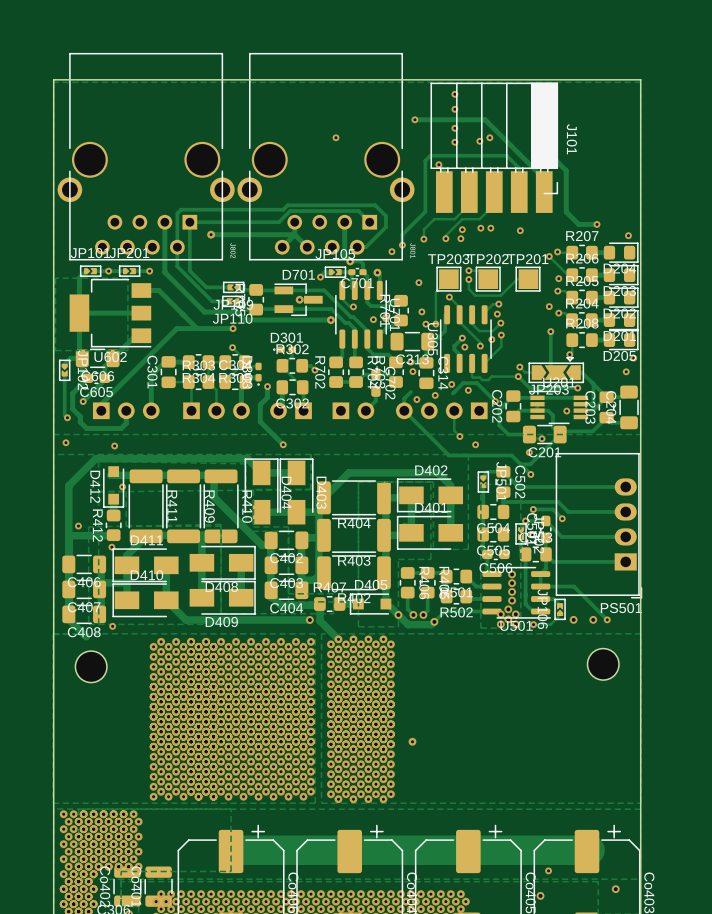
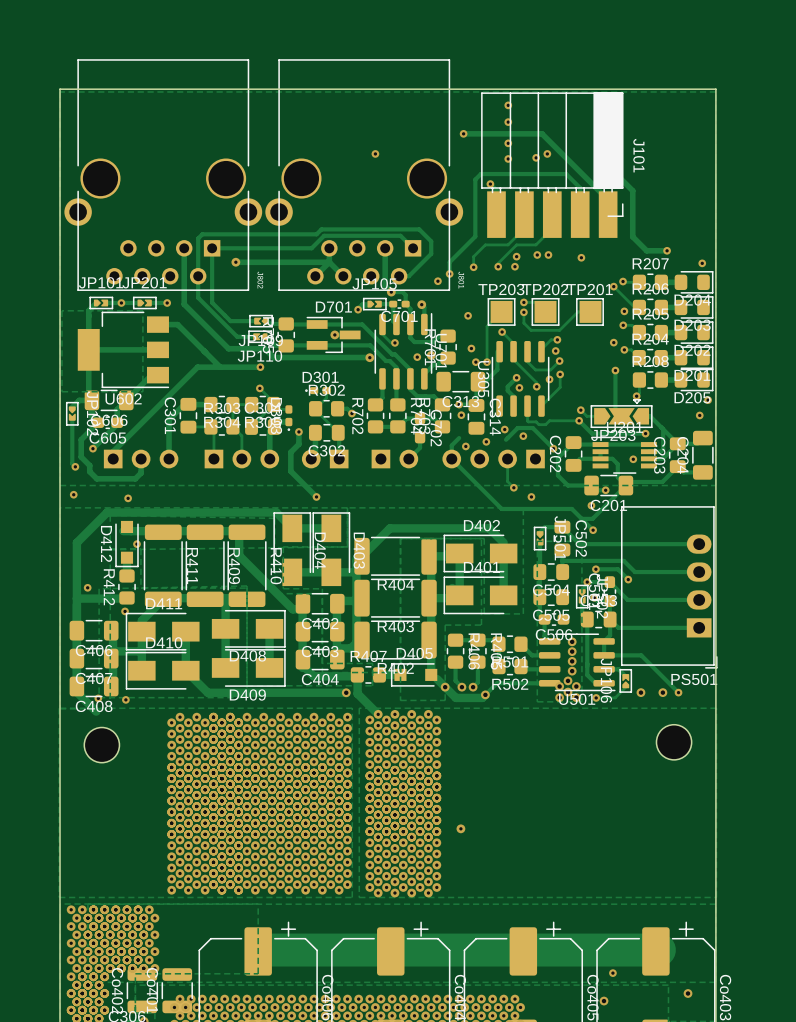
via: none -> (98, 698)

